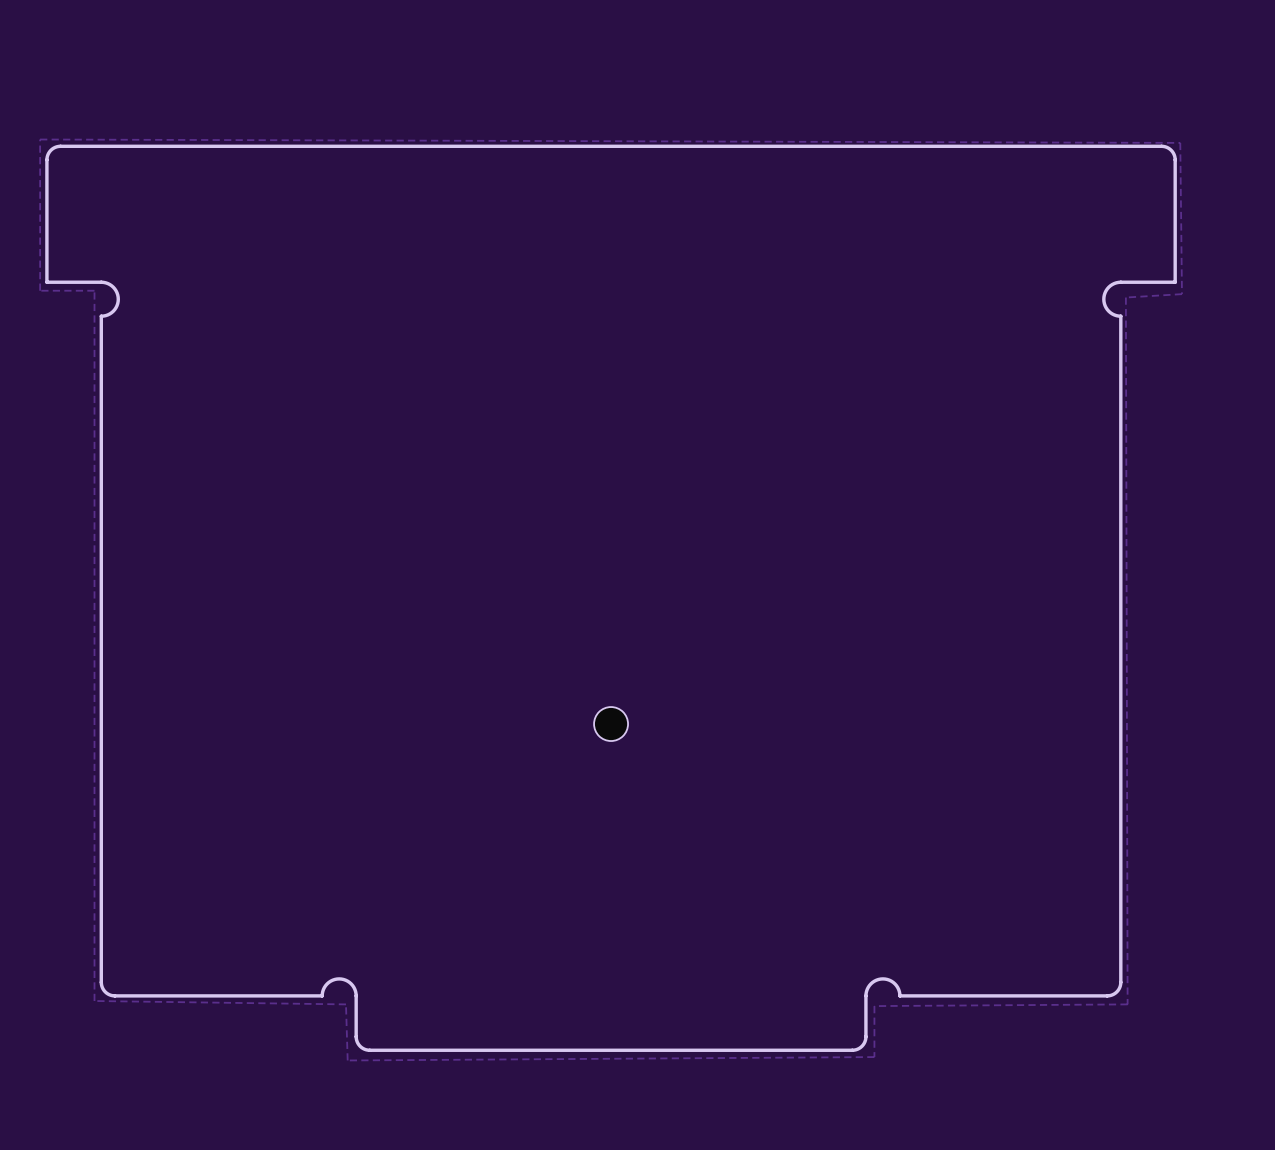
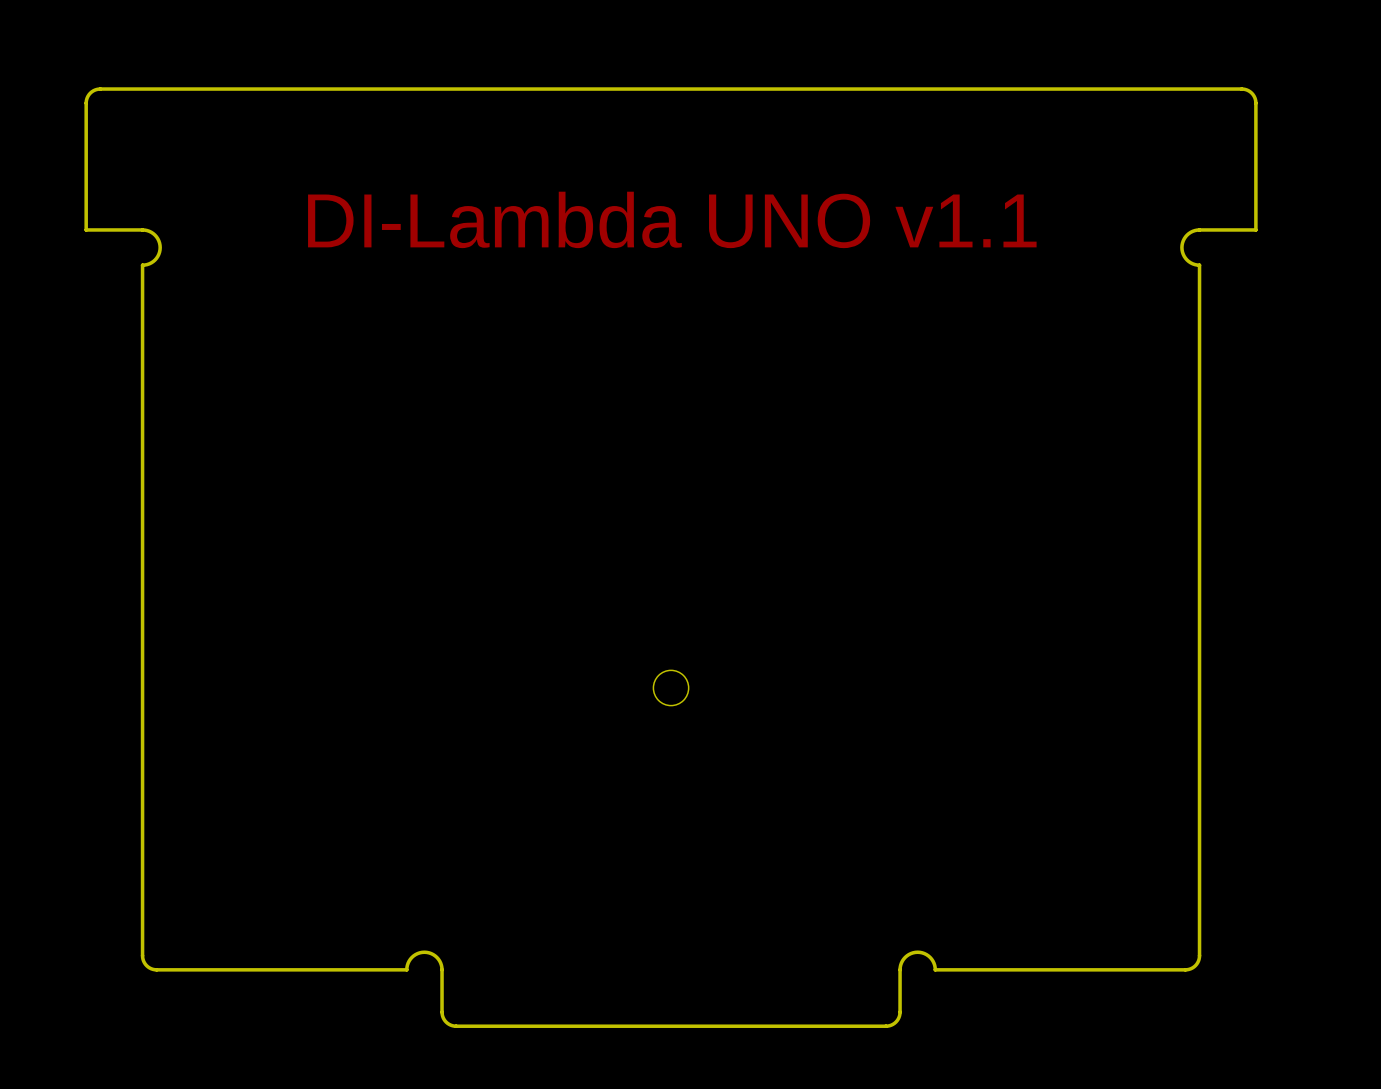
zone outline: (40, 139) (1180, 142) (1181, 294) (1125, 297) (1127, 1004) (874, 1006) (874, 1057) (347, 1060) (345, 1004) (94, 1000) (94, 290) (40, 290) (40, 139) -> none
text: none -> DI-Lambda UNO v1.1 (672, 219)
board edge: (322, 995) (324, 987) (330, 981) (339, 978) (347, 981) (352, 985) (356, 993) (356, 1036) (358, 1044) (367, 1050) (403, 1050) -> (371, 969) (406, 969) (409, 961) (415, 954) (424, 952) (433, 954) (438, 959) (441, 967) (442, 1015) (447, 1023) (456, 1026)
board edge: (899, 995) (897, 987) (891, 981) (882, 978) (874, 981) (869, 985) (866, 993) (865, 1036) (863, 1044) (854, 1050) (818, 1050) -> (970, 969) (935, 969) (932, 961) (926, 954) (917, 952) (908, 954) (903, 959) (900, 967) (899, 1015) (894, 1023) (885, 1026)

